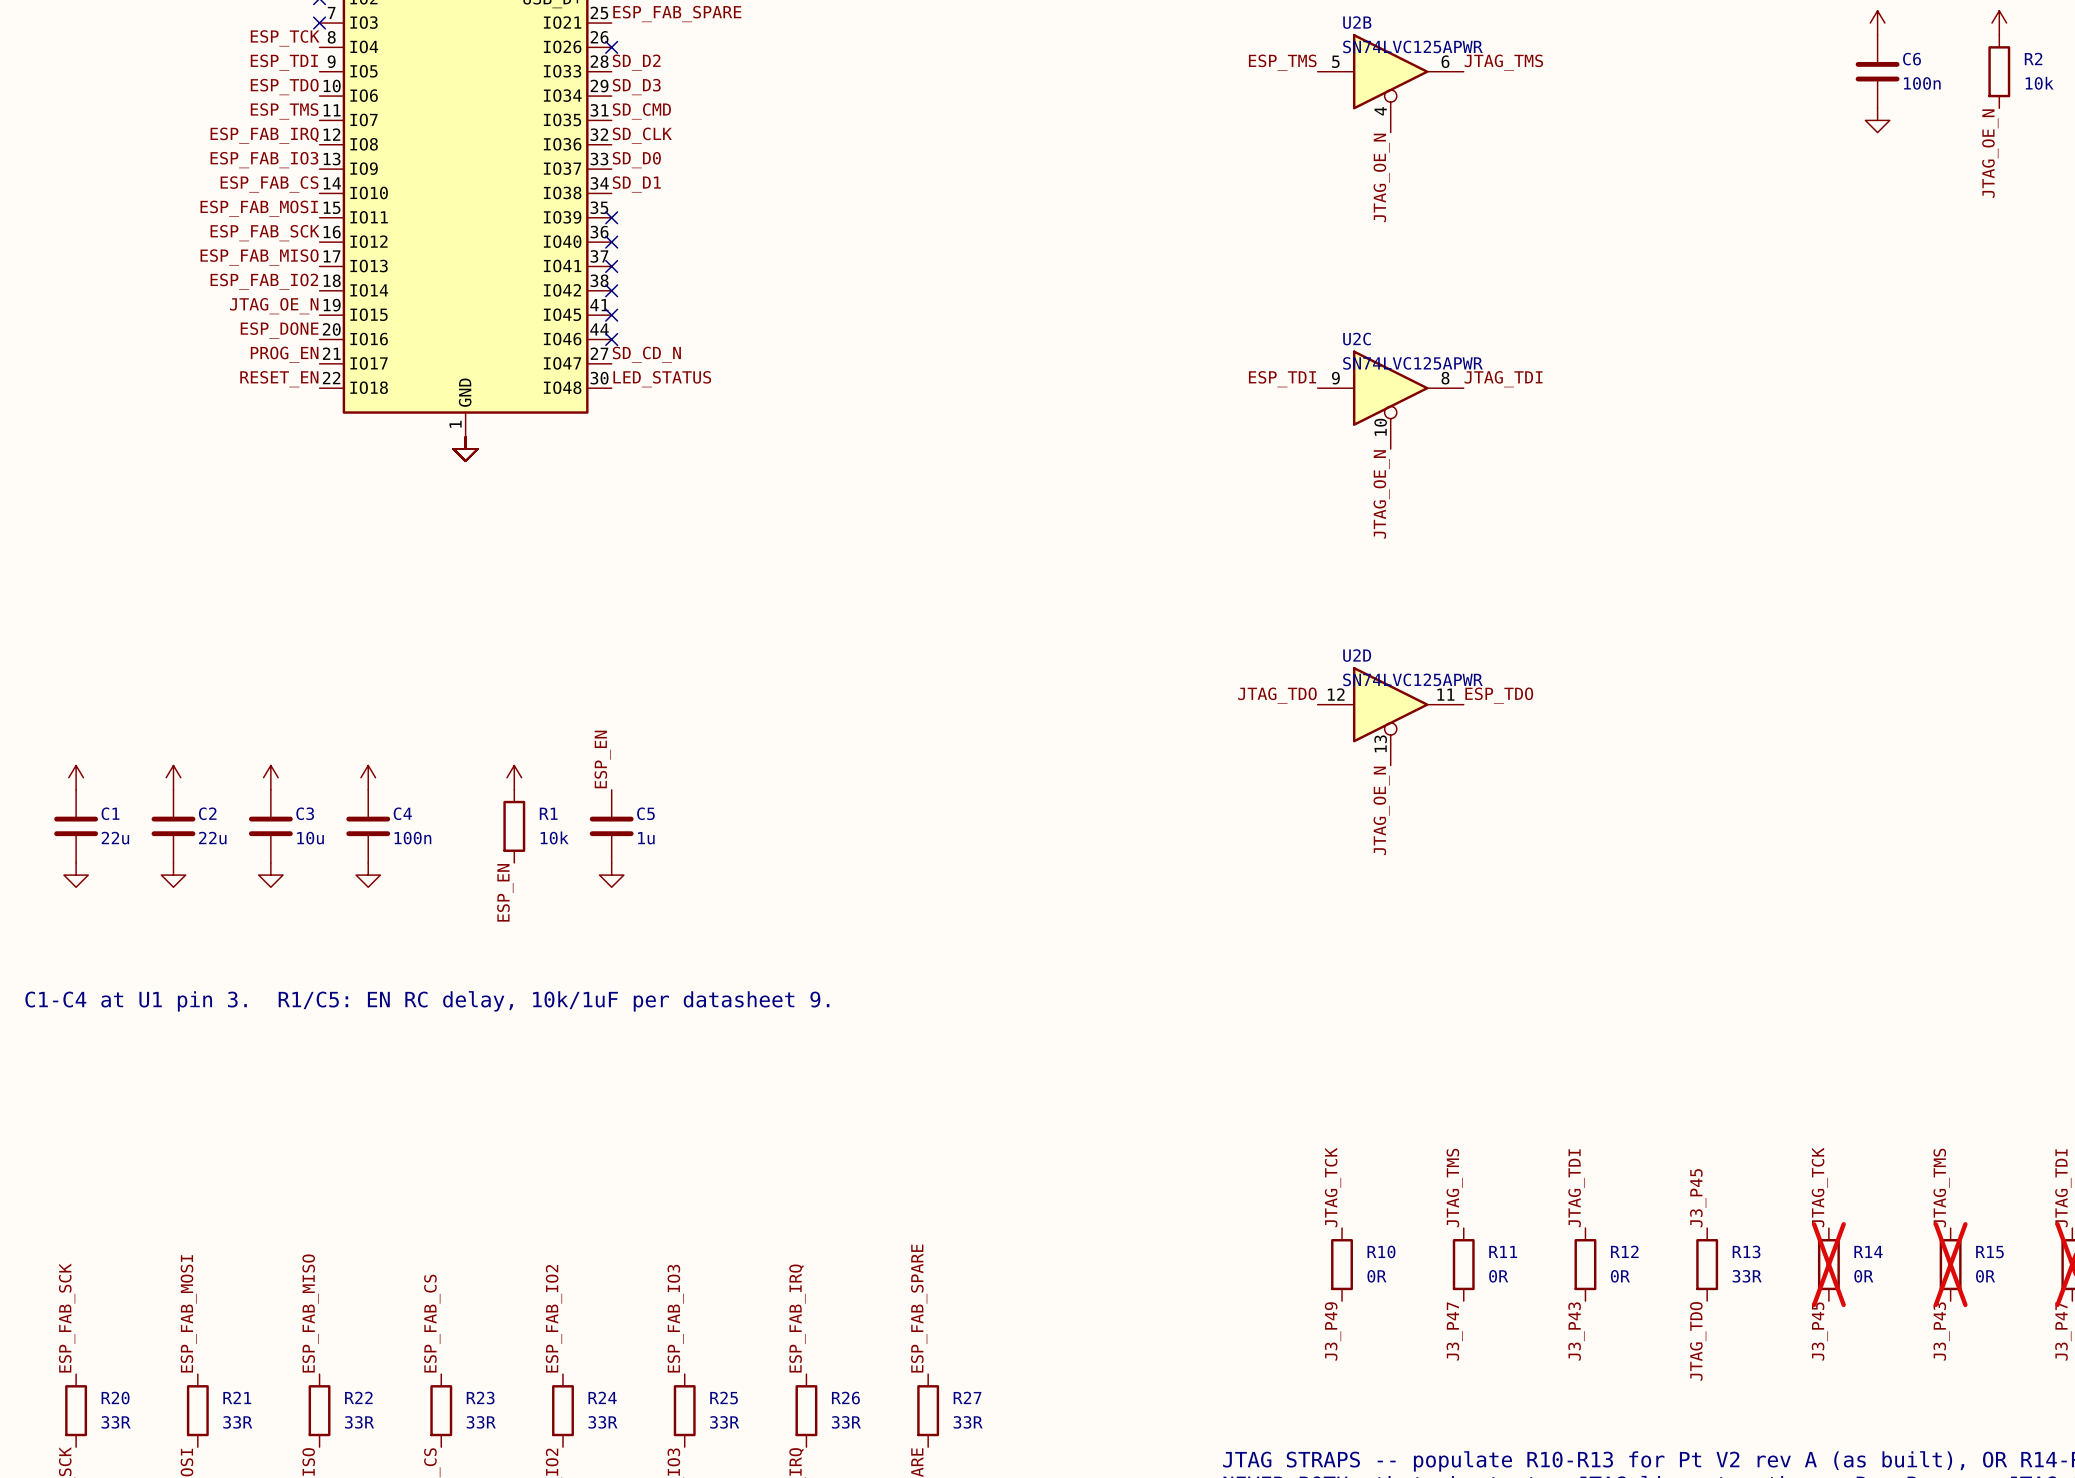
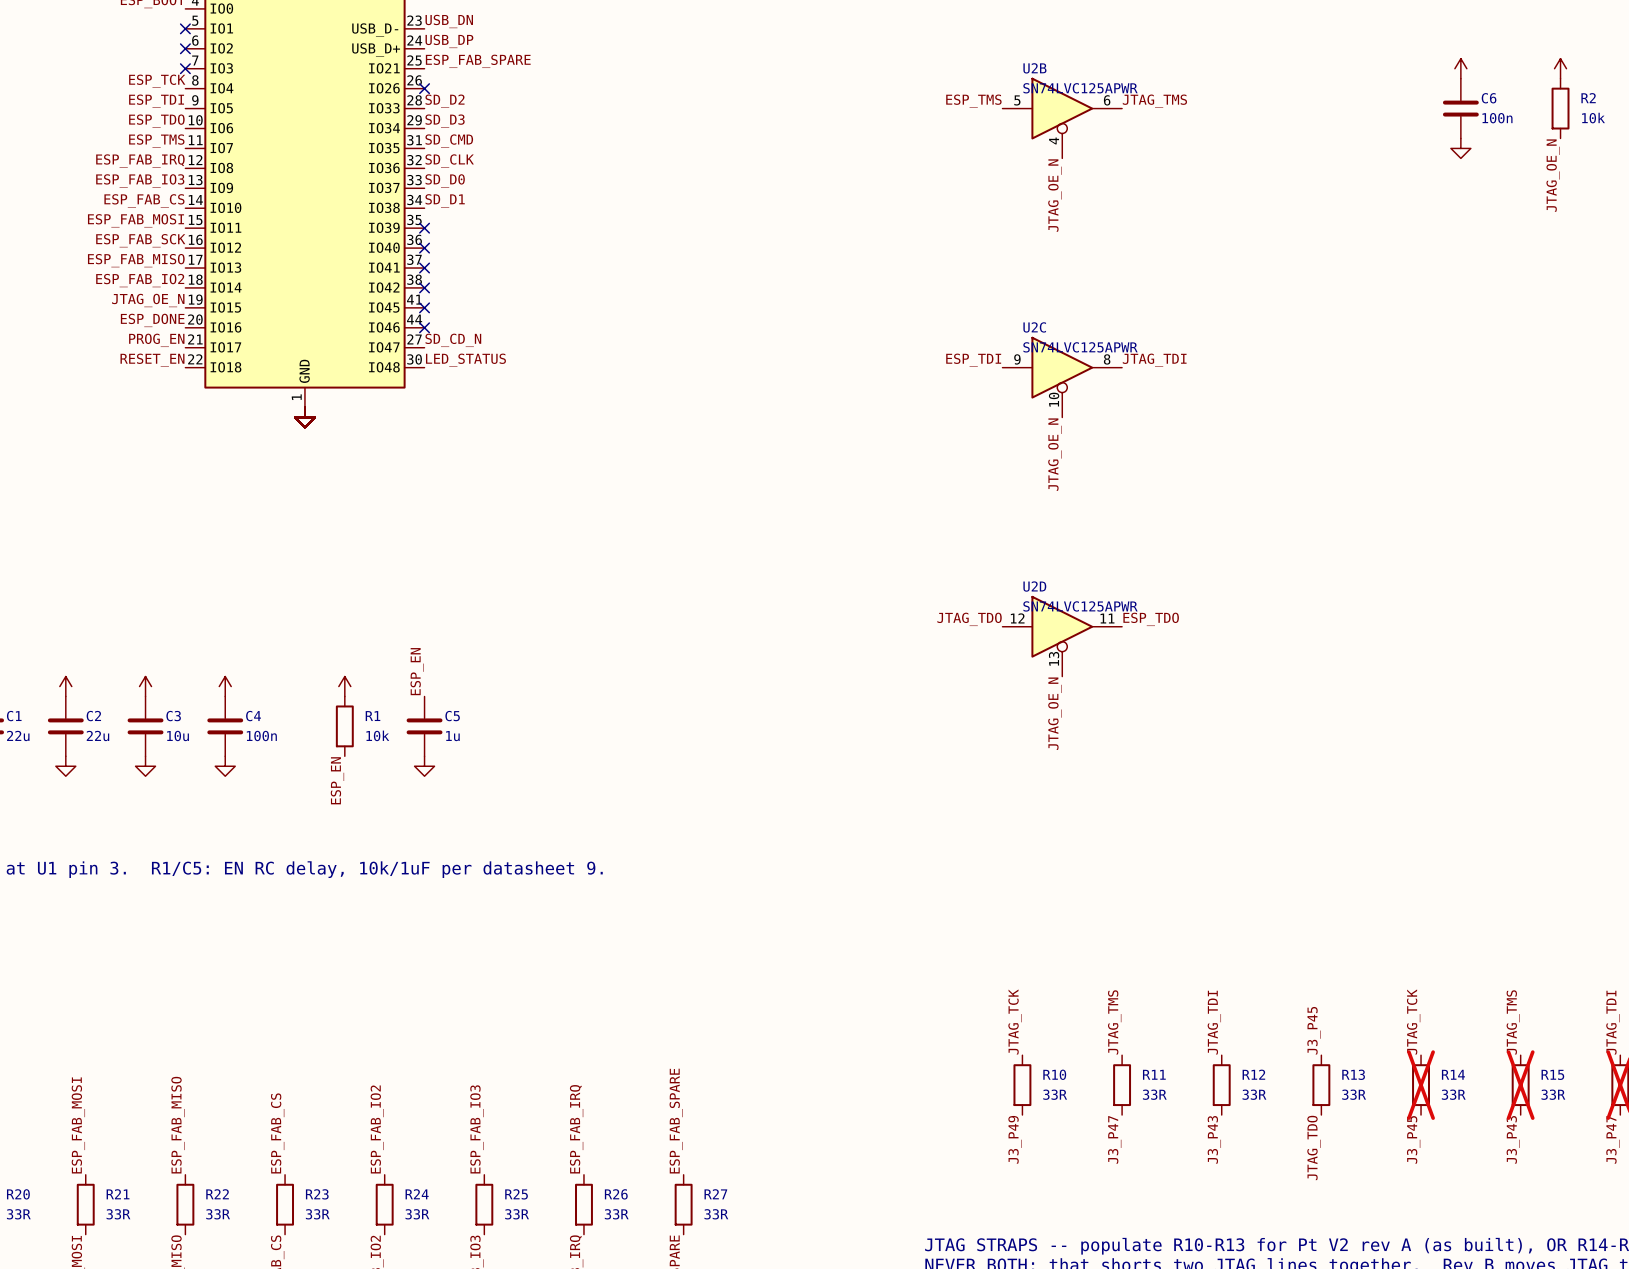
R10 value: 0R (1376, 1276) -> 33R (1055, 1094)
R11 value: 0R (1498, 1276) -> 33R (1154, 1094)
R12 value: 0R (1620, 1276) -> 33R (1254, 1094)
R14 value: 0R (1863, 1276) -> 33R (1453, 1094)
R15 value: 0R (1985, 1276) -> 33R (1553, 1094)

